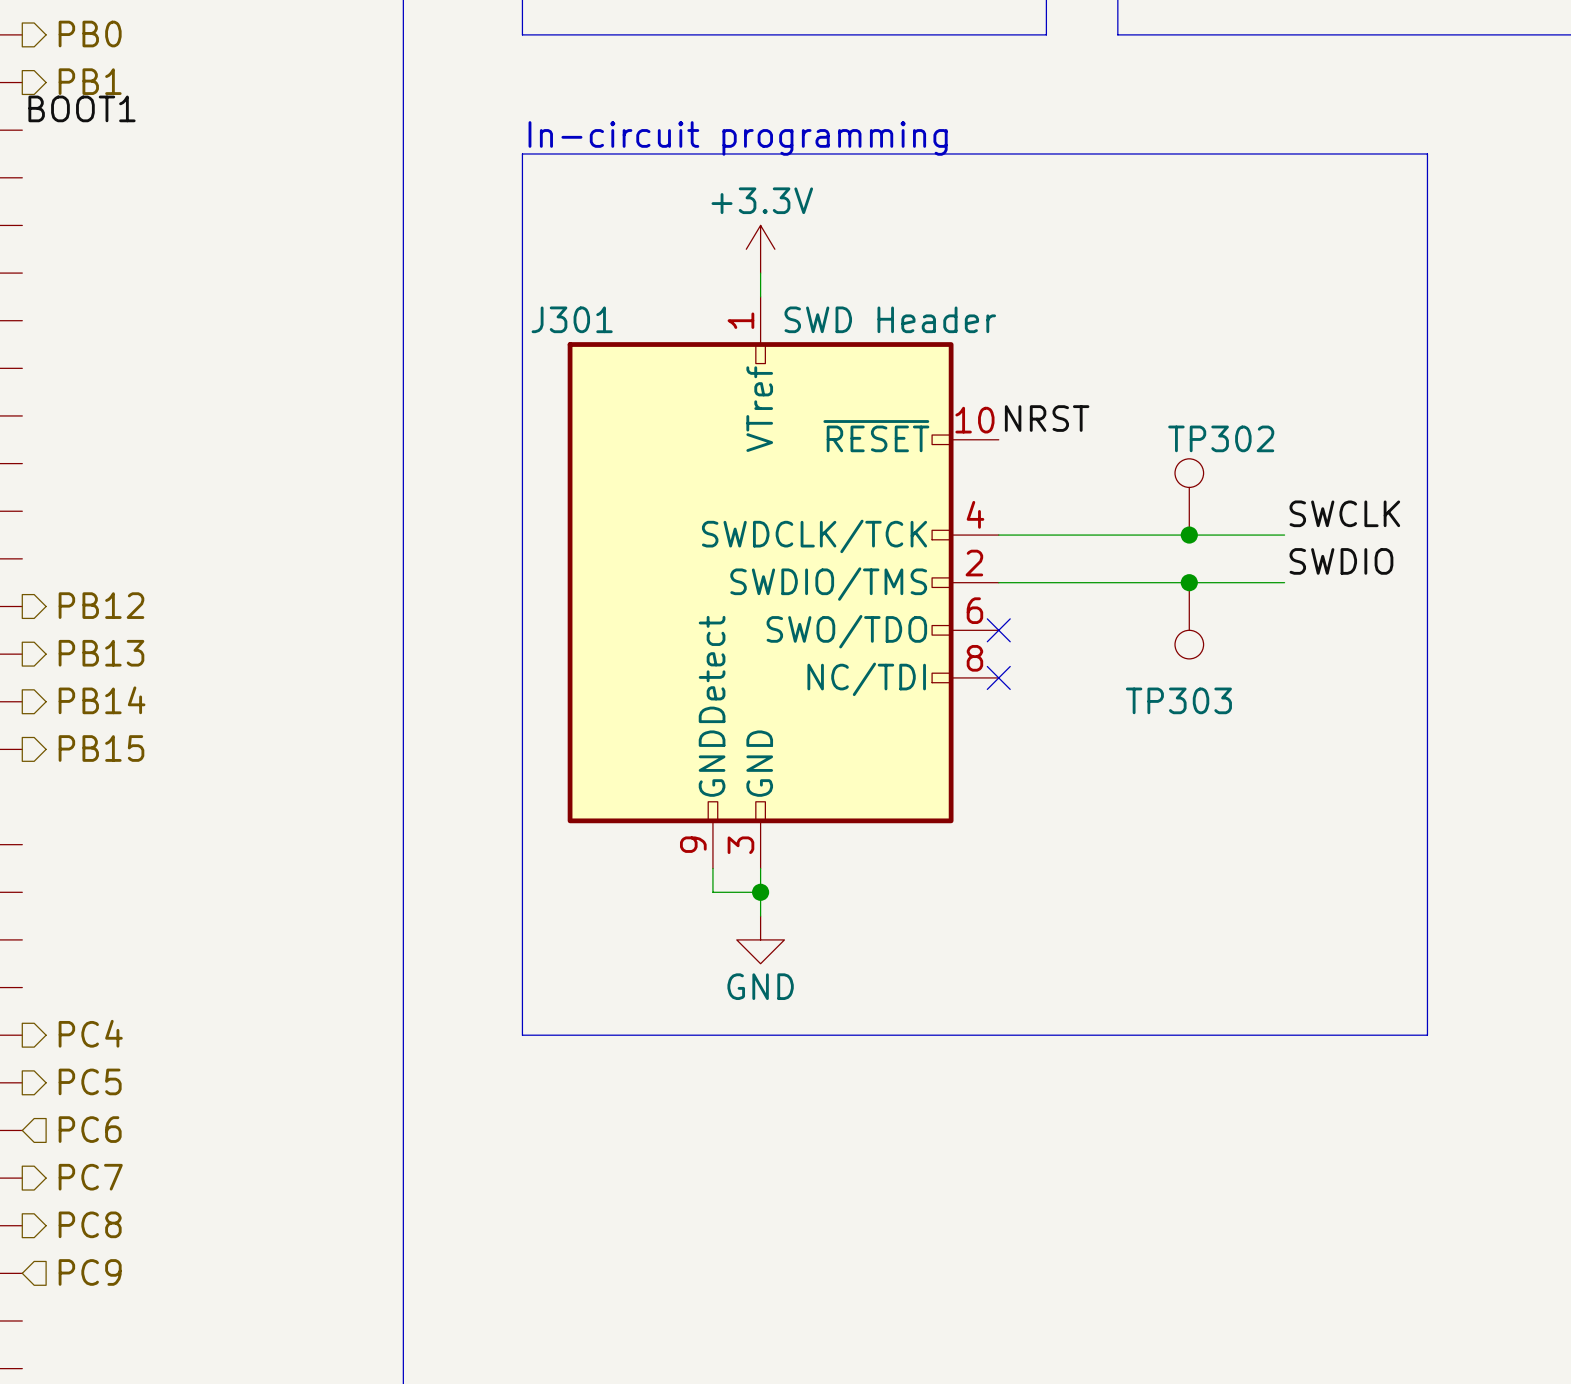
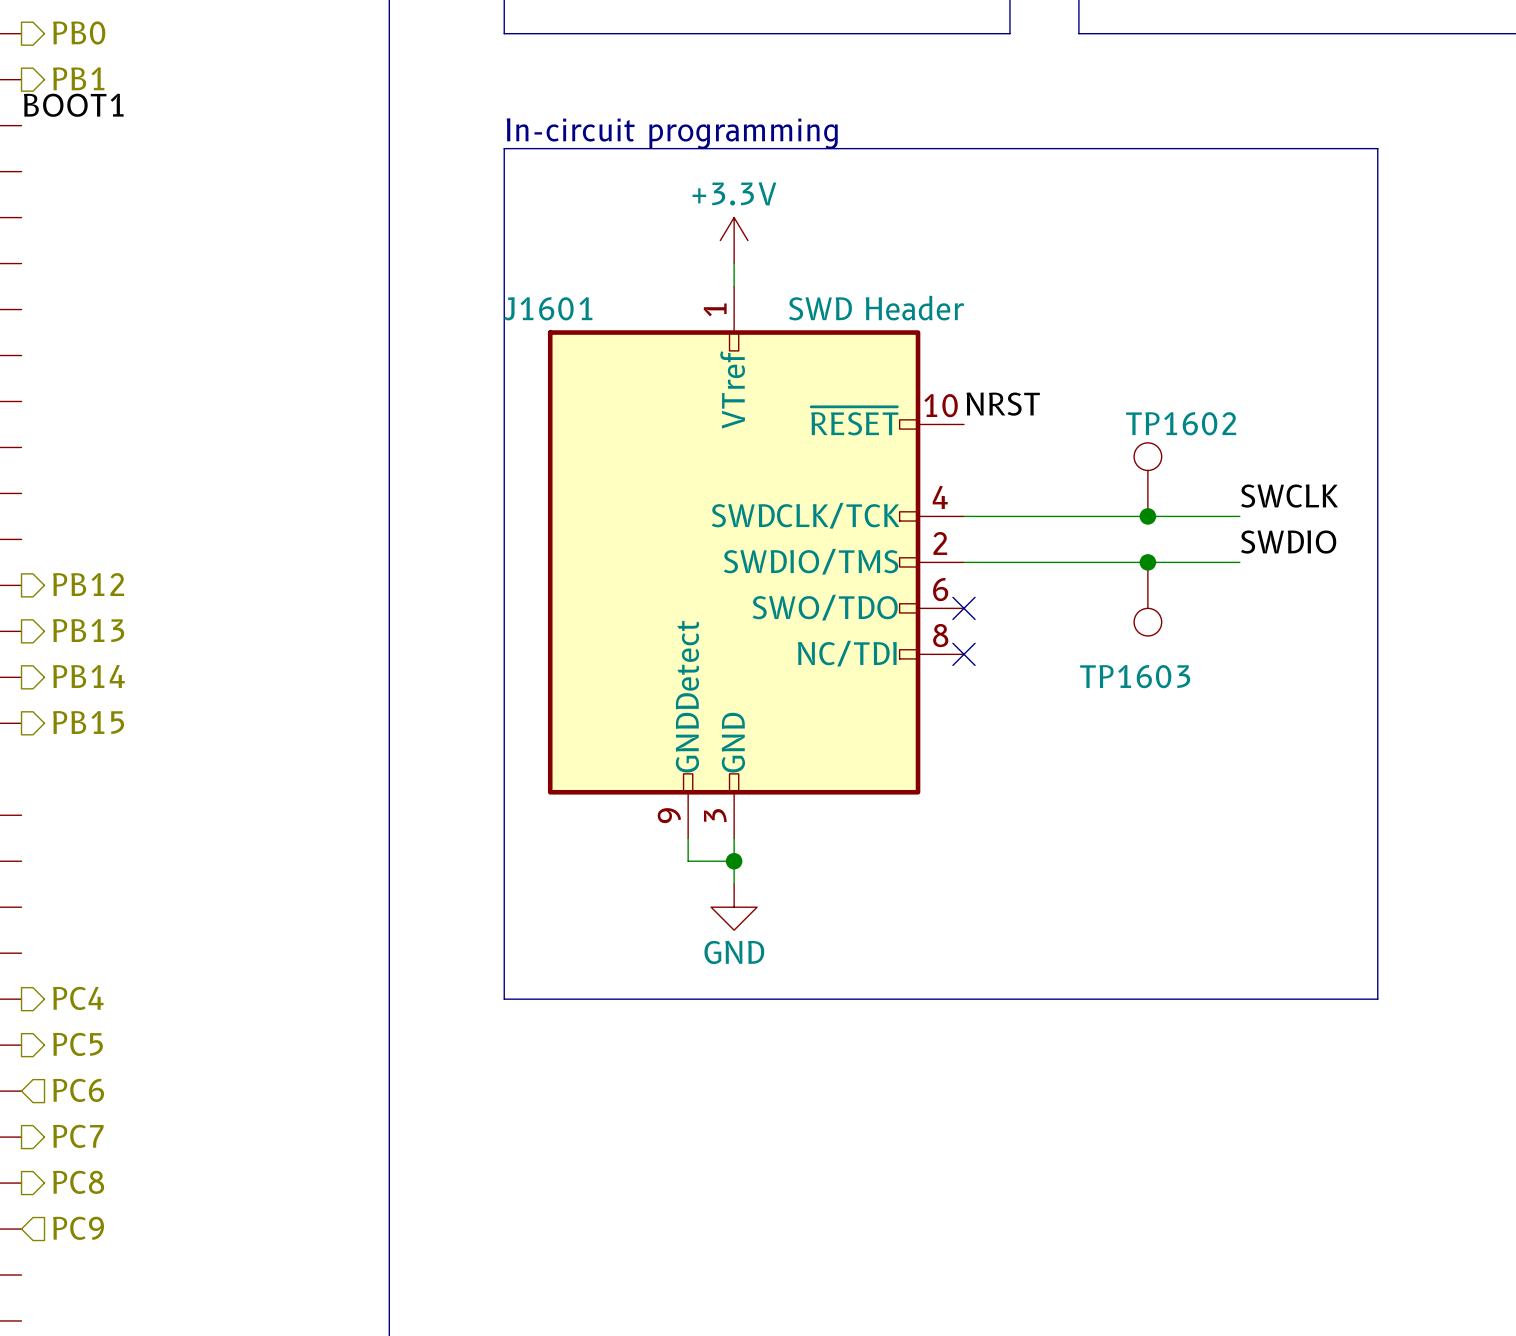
J301 name: J301 (572, 319) -> J1601 (548, 308)
TP302 name: TP302 (1221, 438) -> TP1602 (1181, 423)
TP303 name: TP303 (1178, 700) -> TP1603 (1135, 676)

